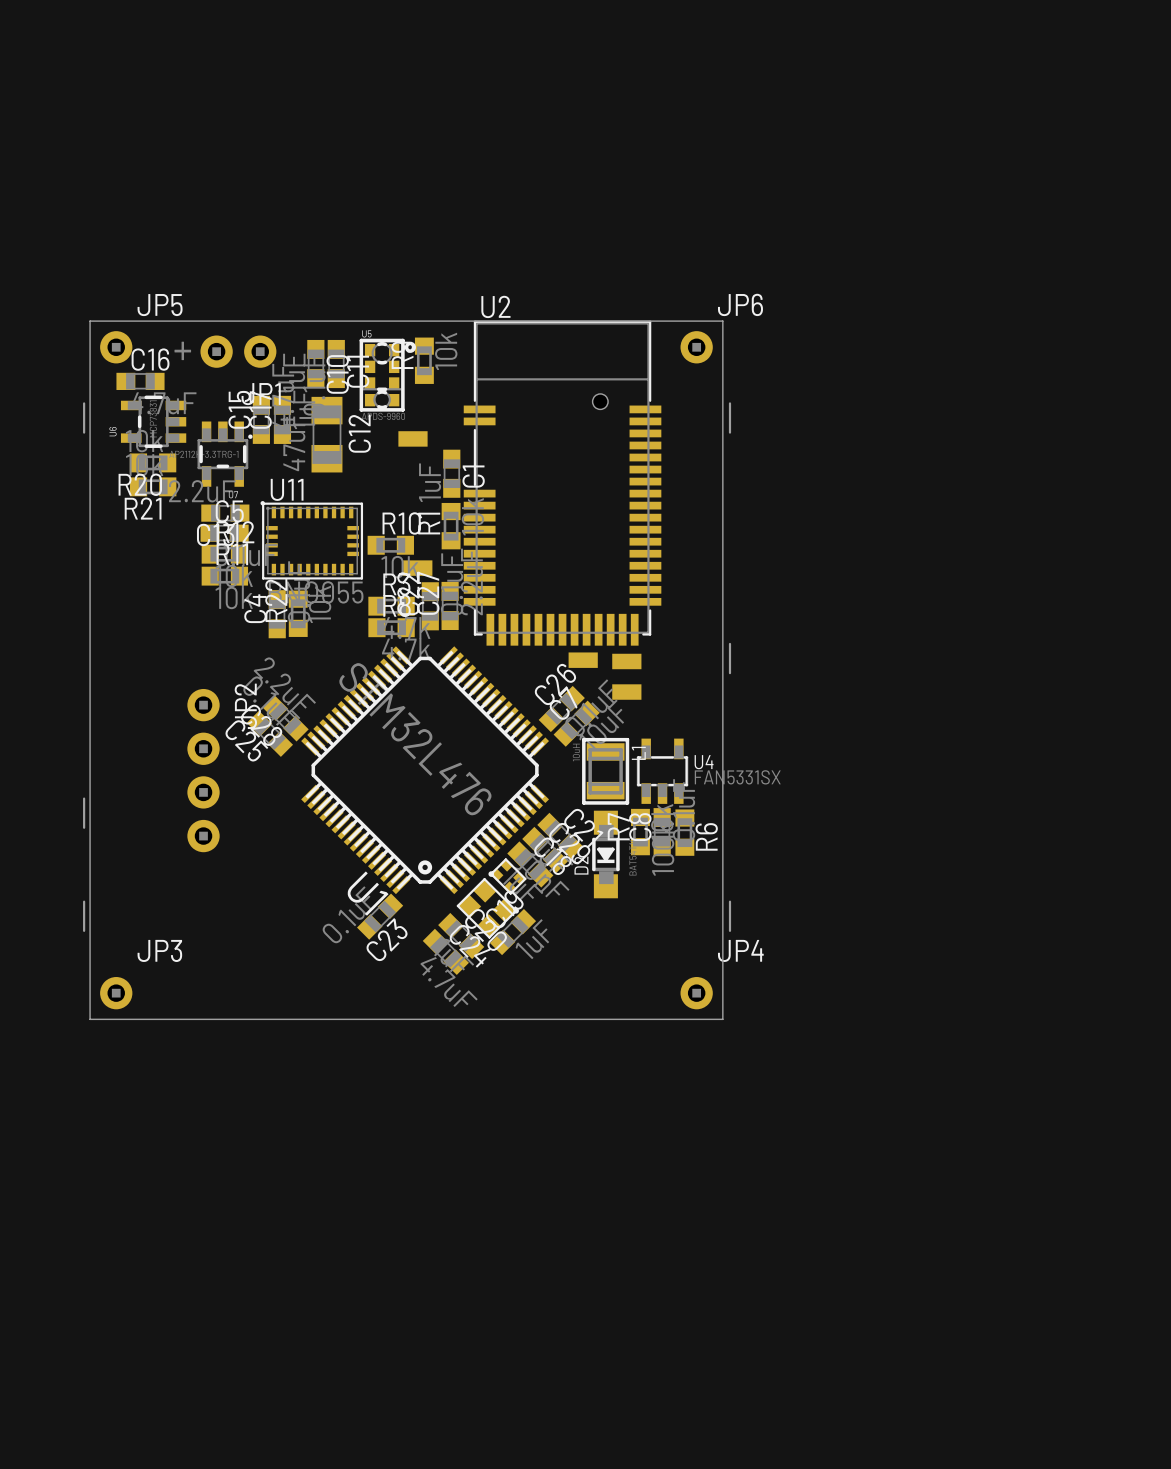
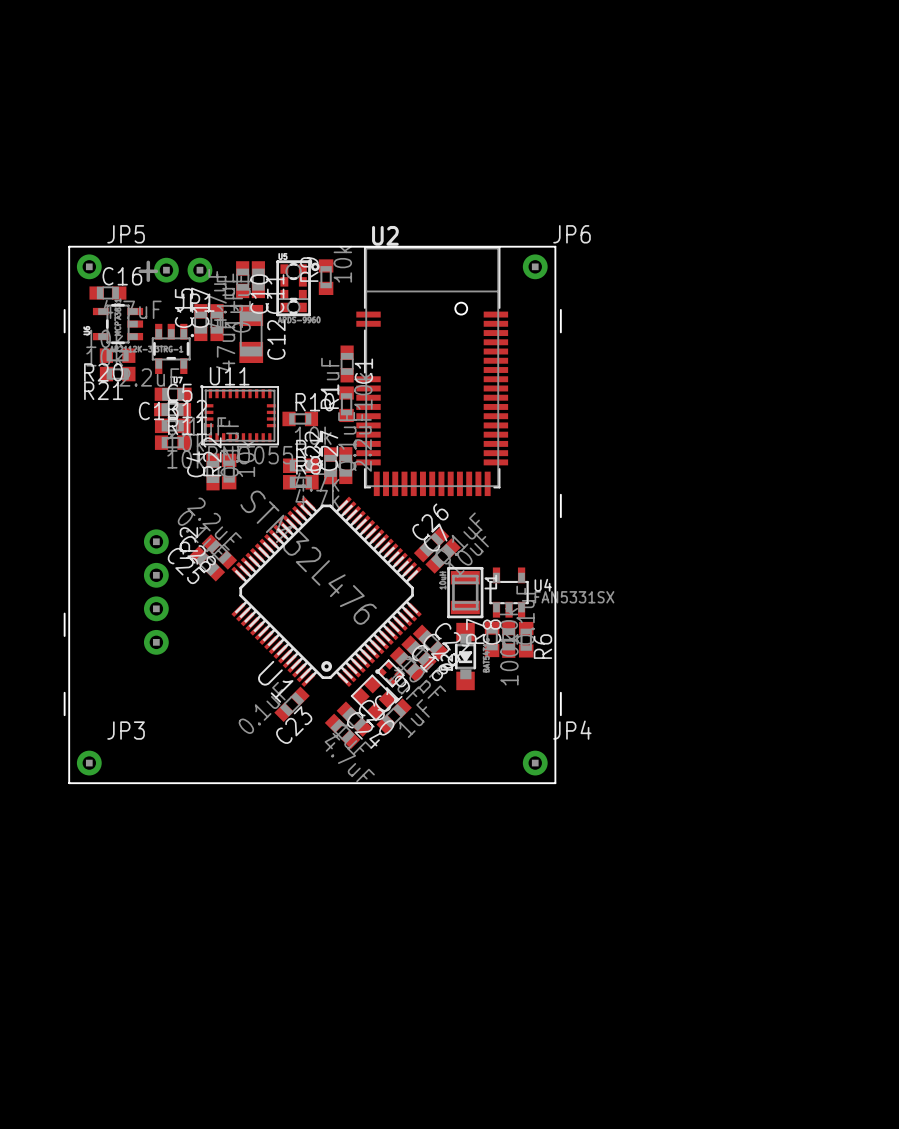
part: (412, 438) -> none
part: (417, 568) -> none
part: (583, 660) -> none
part: (626, 661) -> none
part: (626, 692) -> none

